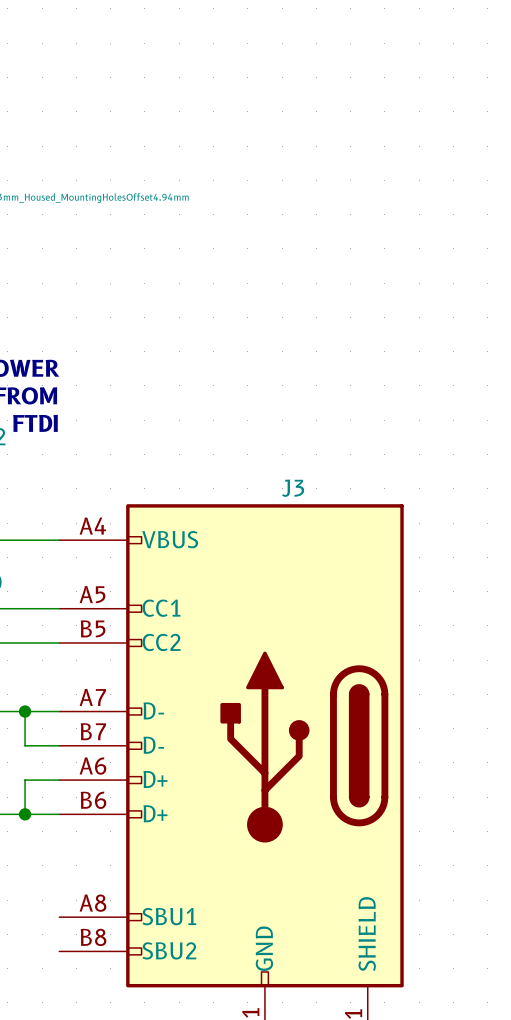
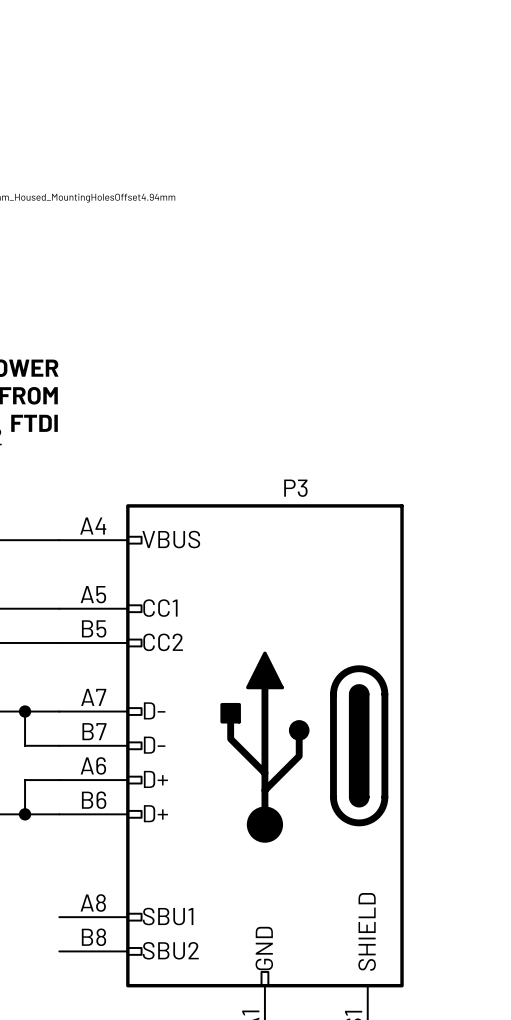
J3 name: J3 (293, 488) -> P3 (295, 488)

